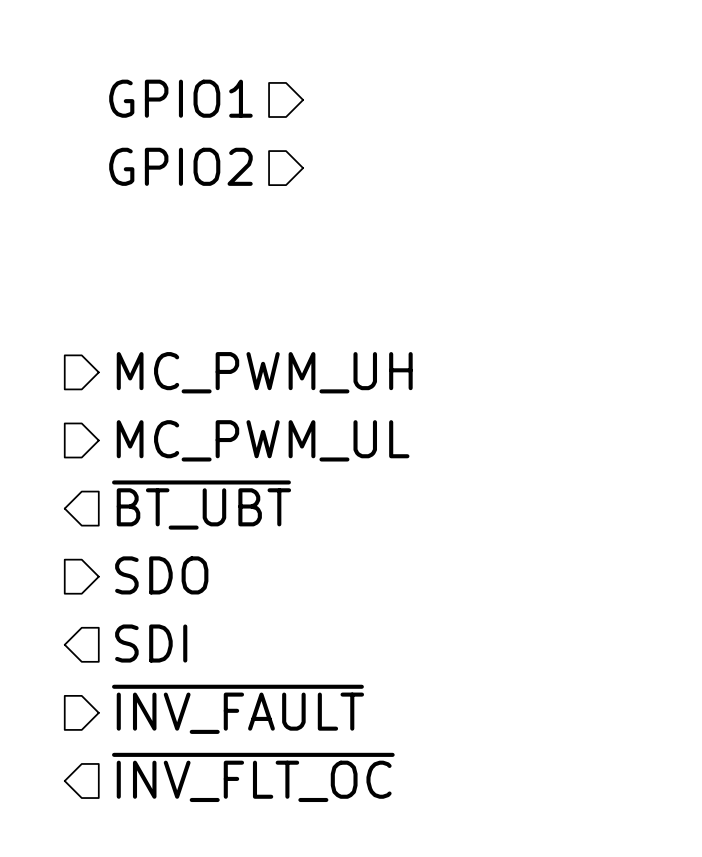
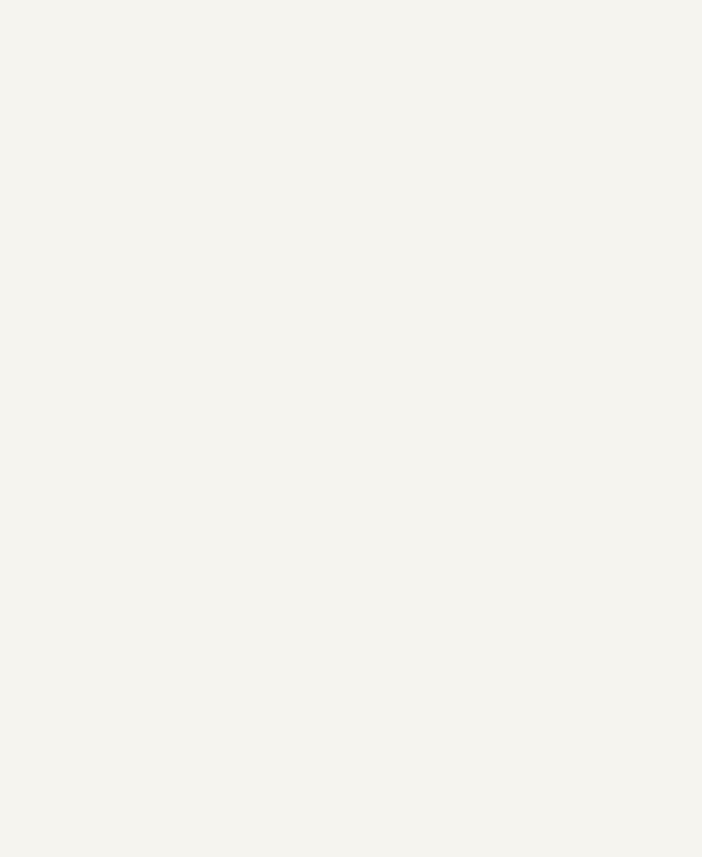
hierarchical label: GPIO1 (180, 98) -> none
hierarchical label: GPIO2 (180, 166) -> none
hierarchical label: MC_PWM_UH (264, 372) -> none
hierarchical label: MC_PWM_UL (263, 440) -> none
hierarchical label: ~{BT_UBT} (201, 505) -> none
hierarchical label: SDO (161, 575) -> none
hierarchical label: SDI (151, 643) -> none
hierarchical label: ~{INV_FAULT} (238, 709) -> none
hierarchical label: ~{INV_FLT_OC} (253, 777) -> none

